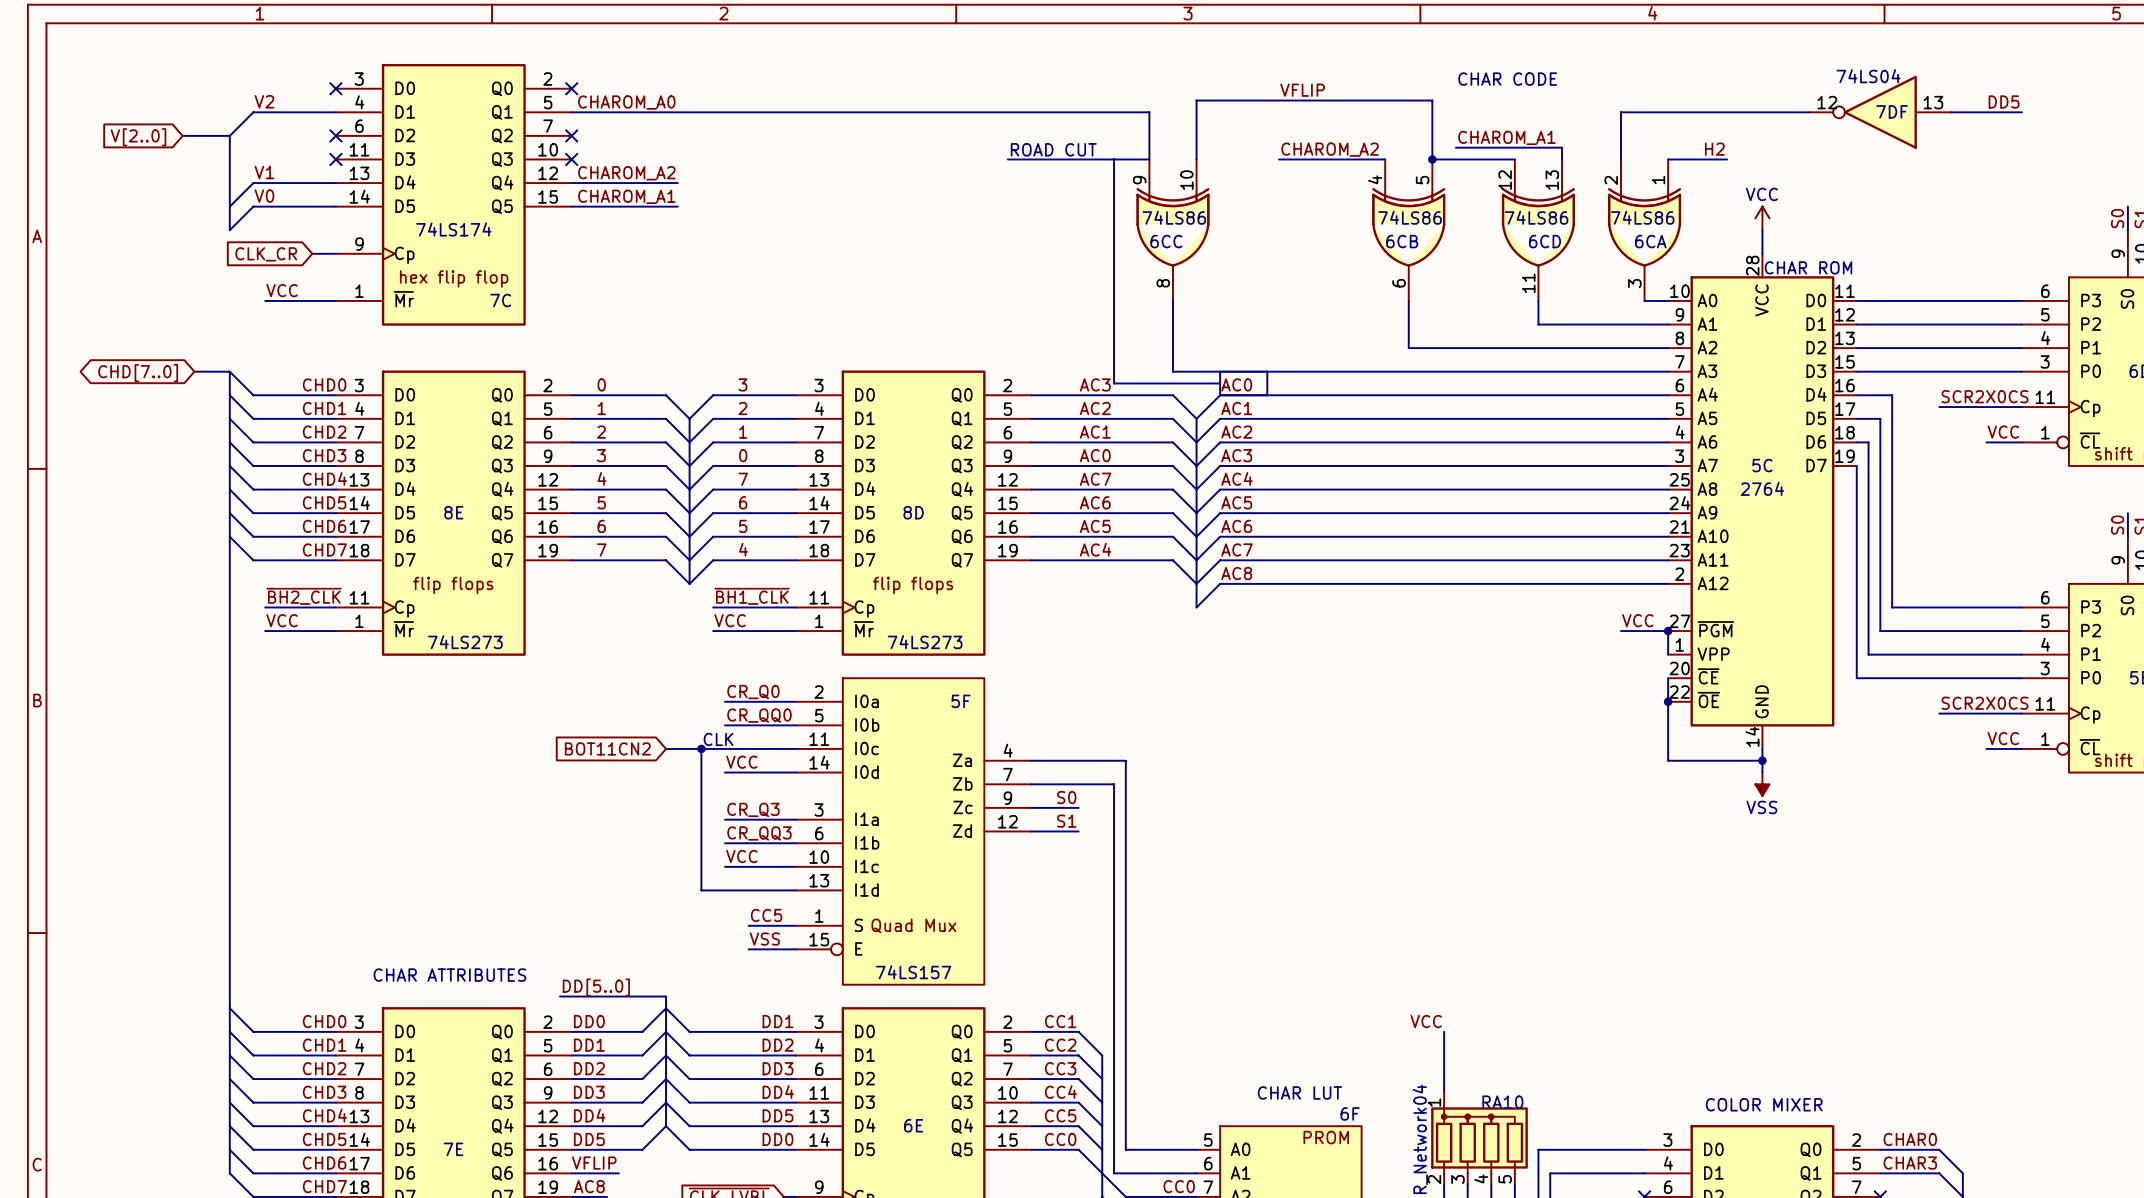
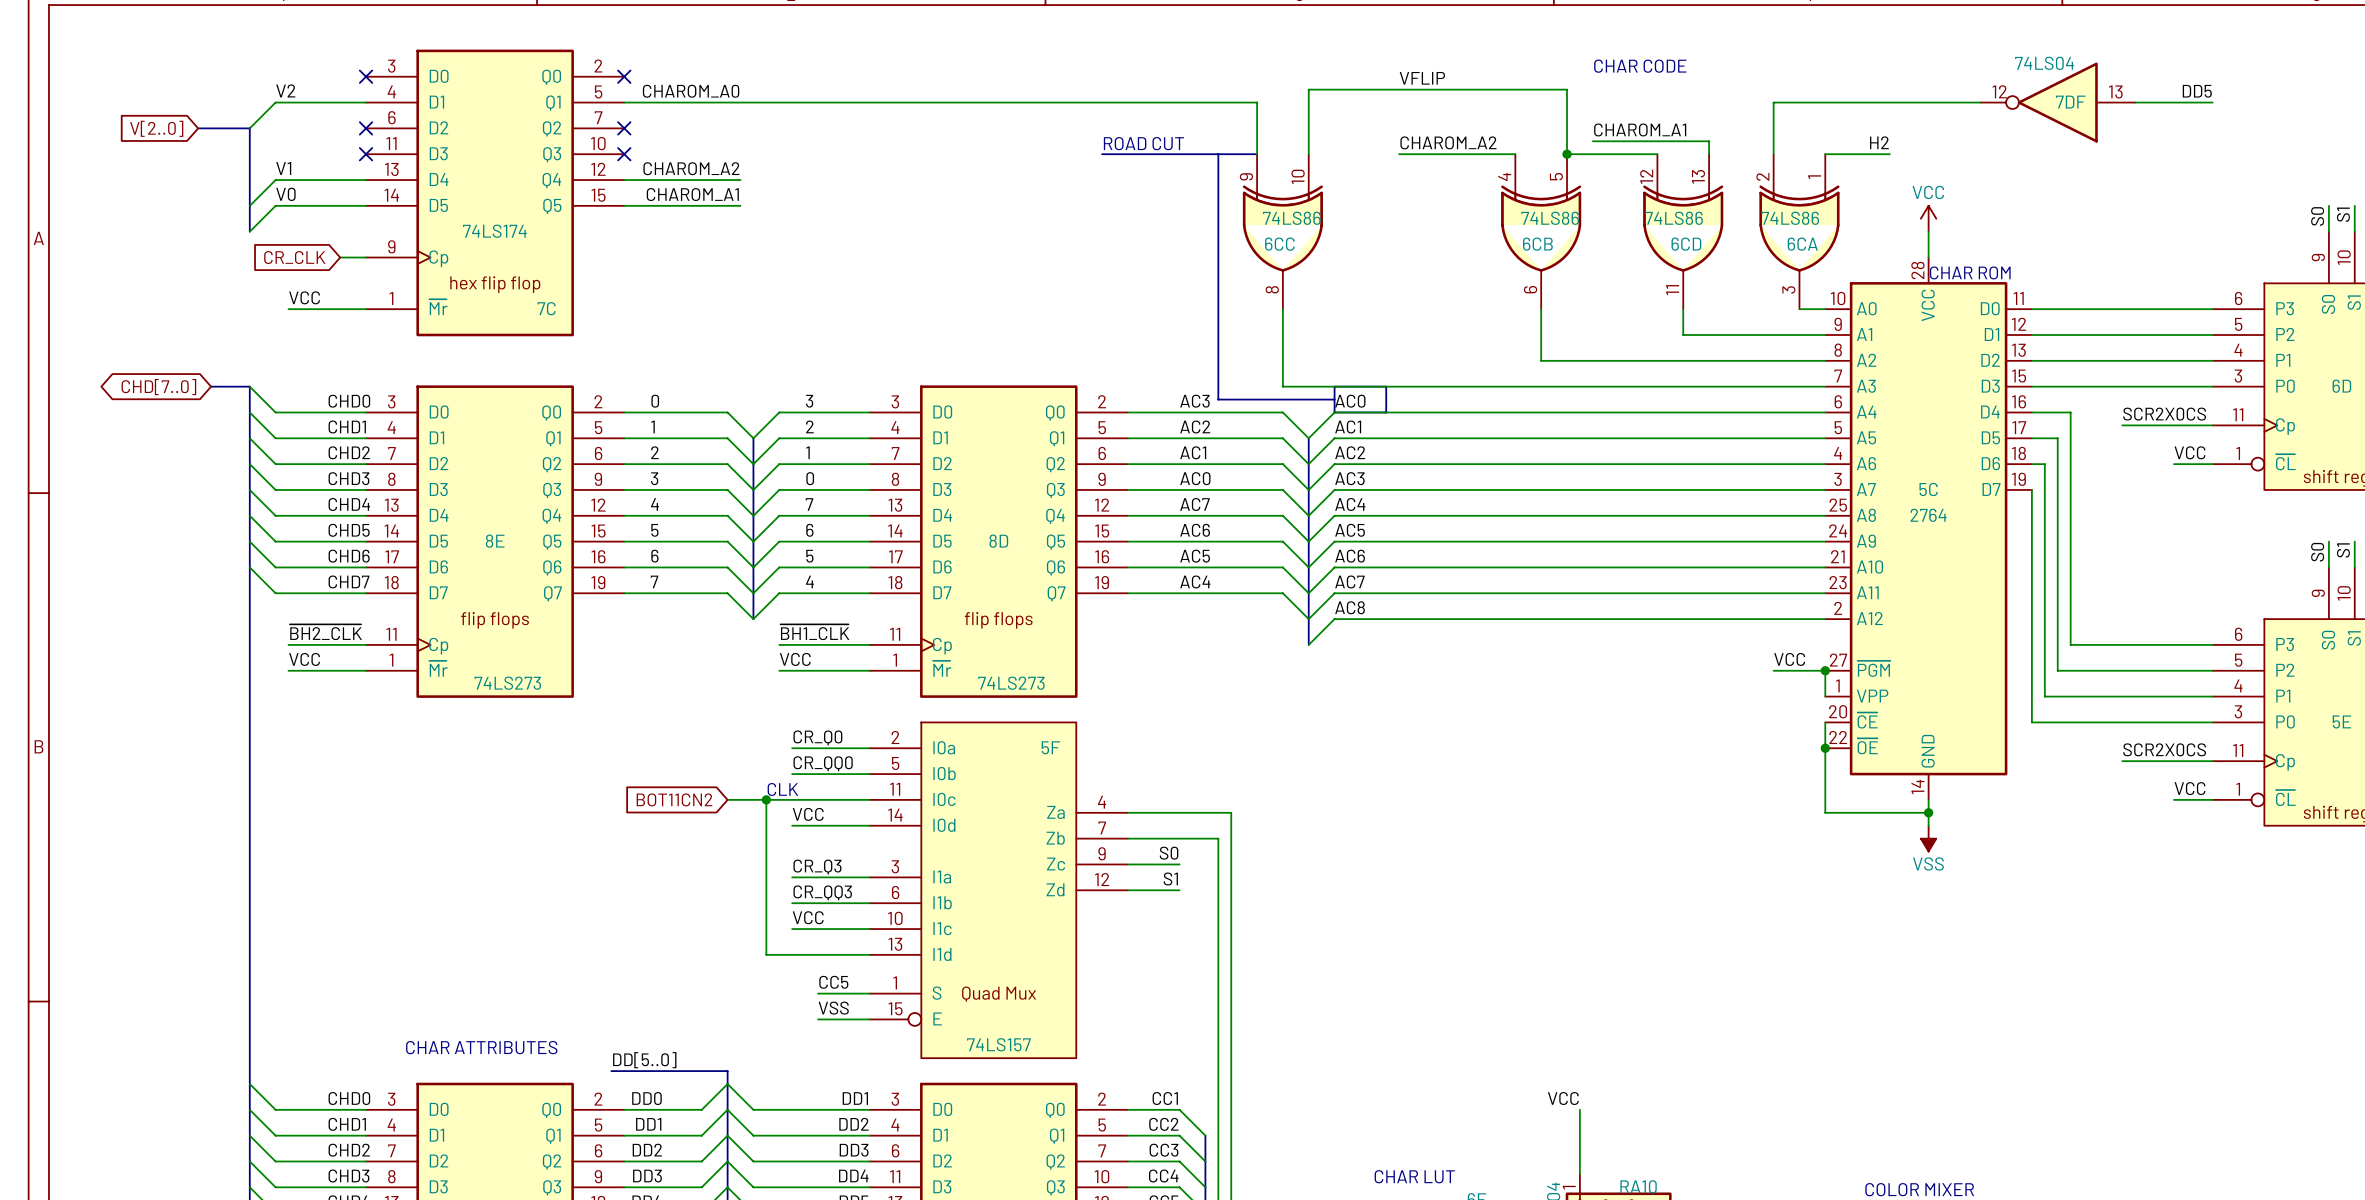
global label: CLK_CR (266, 254) -> CR_CLK (294, 257)

